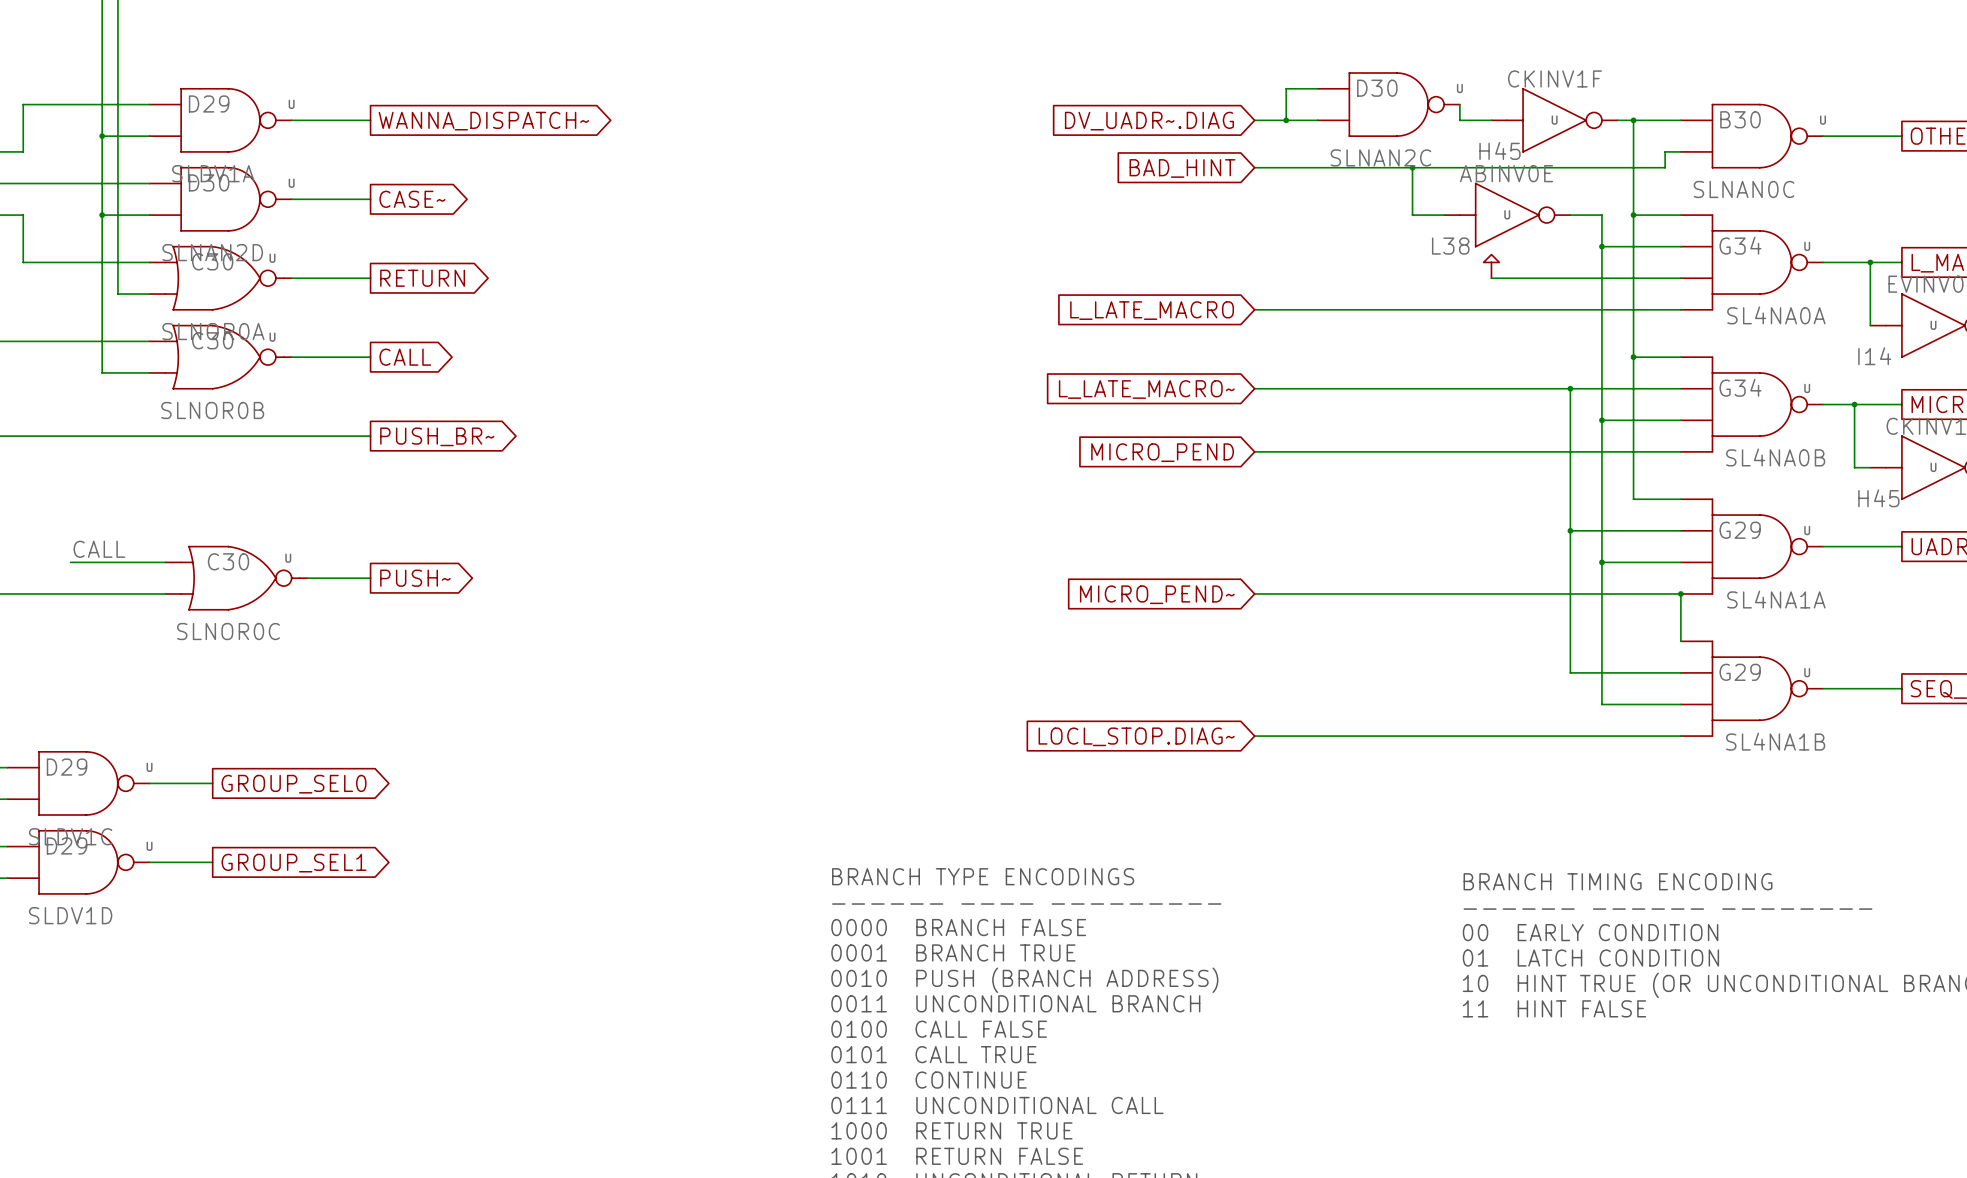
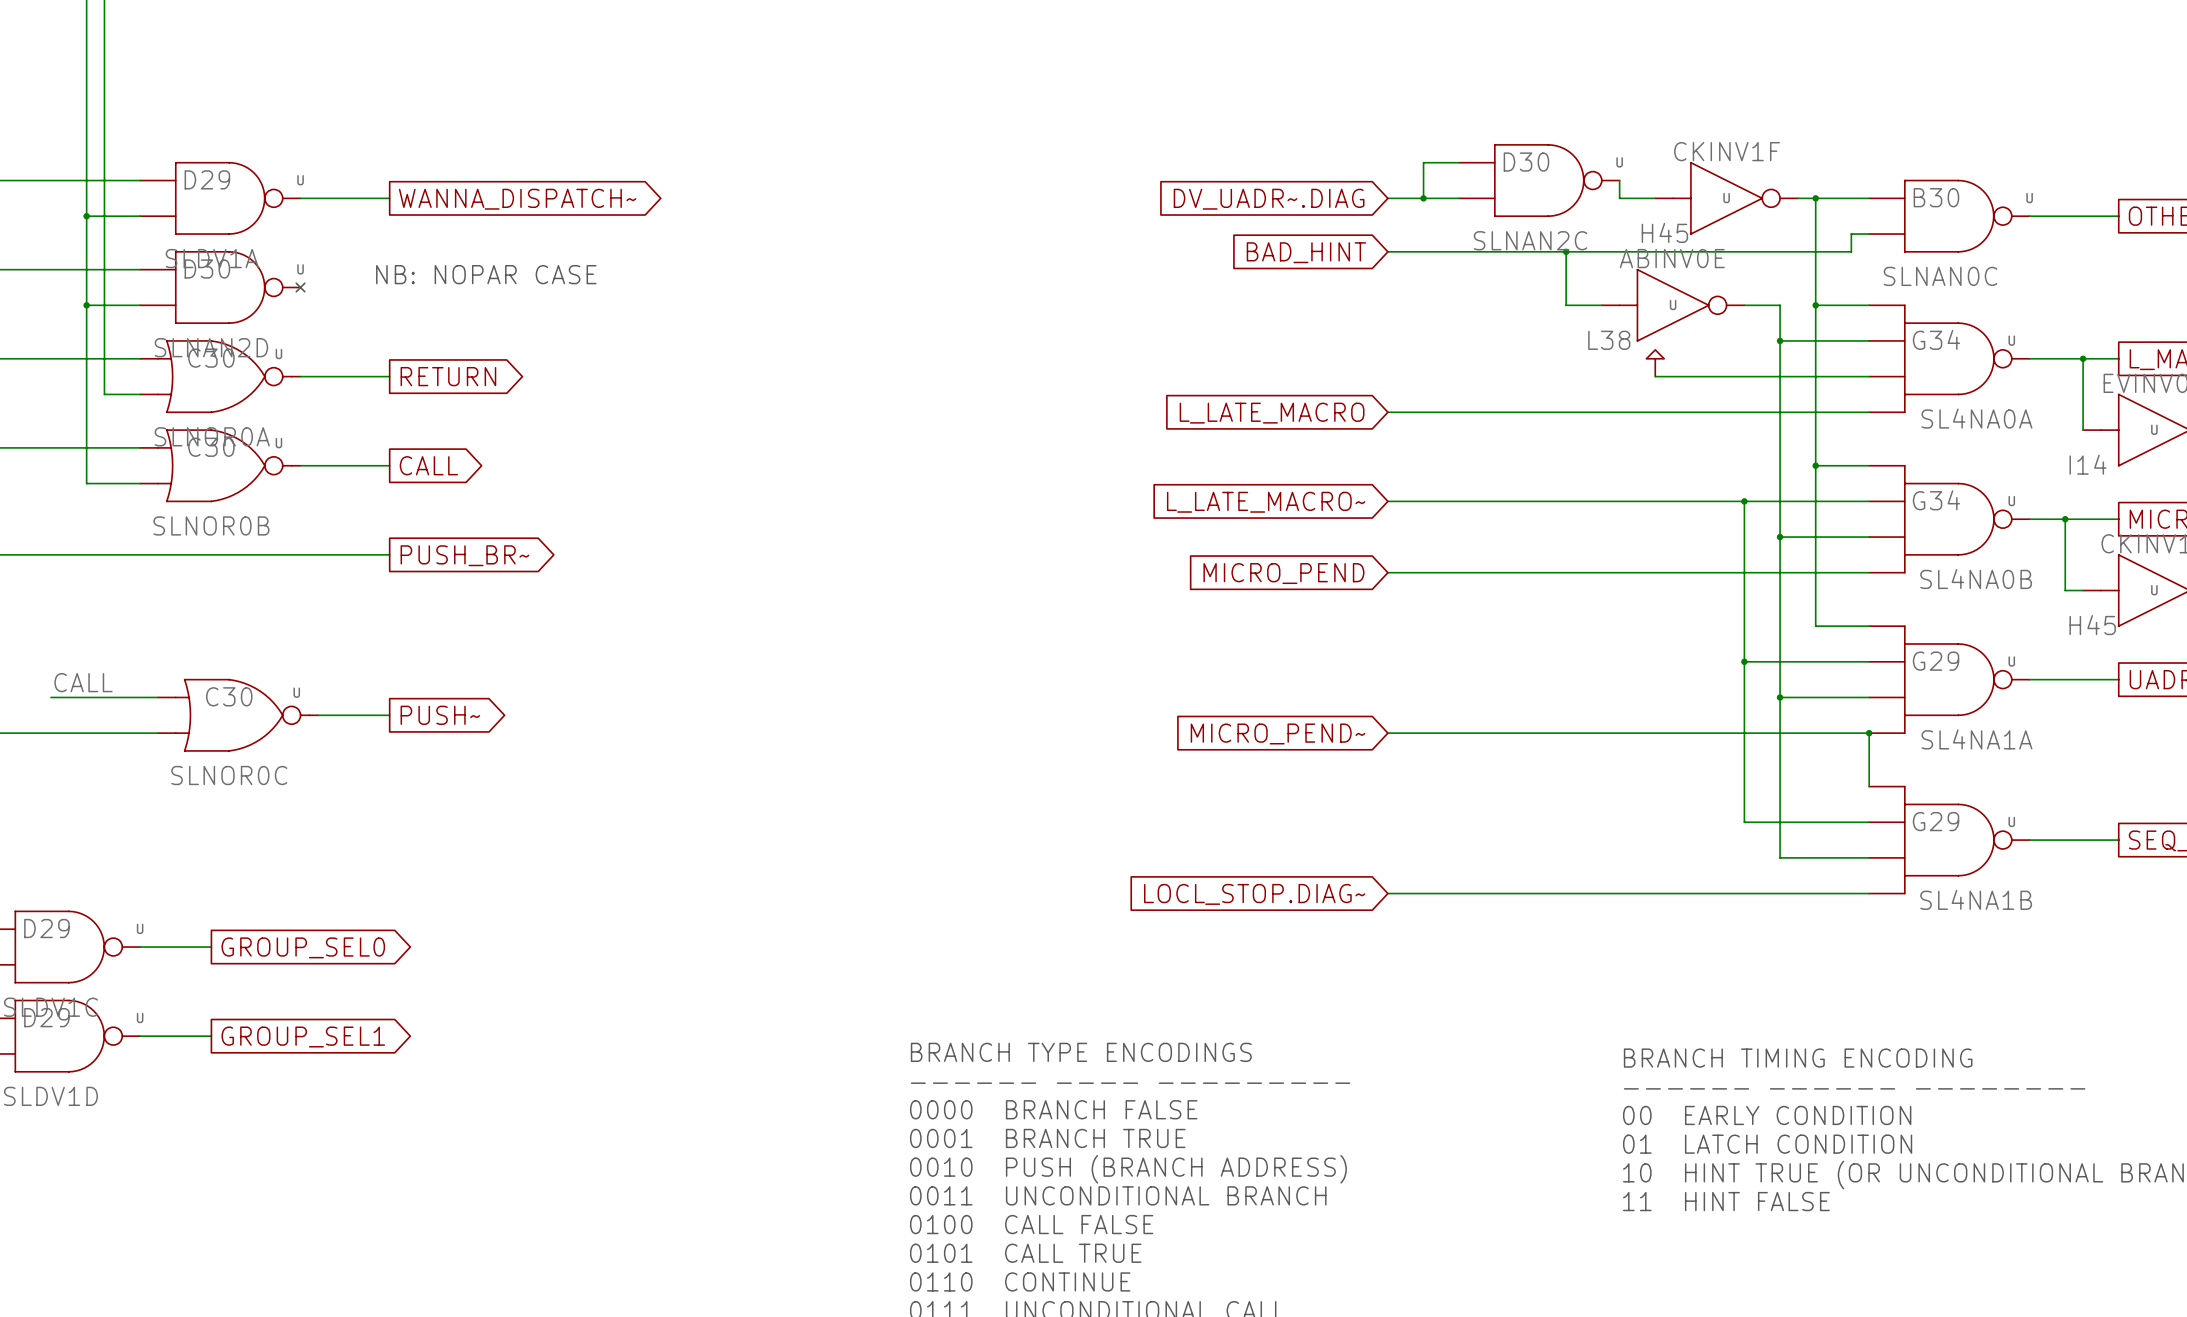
text: none -> NB: NOPAR CASE (486, 274)
wire: (291, 199) (370, 199) -> none
no-connect mark: none -> (300, 287)
global label: CASE~ (412, 199) -> none

